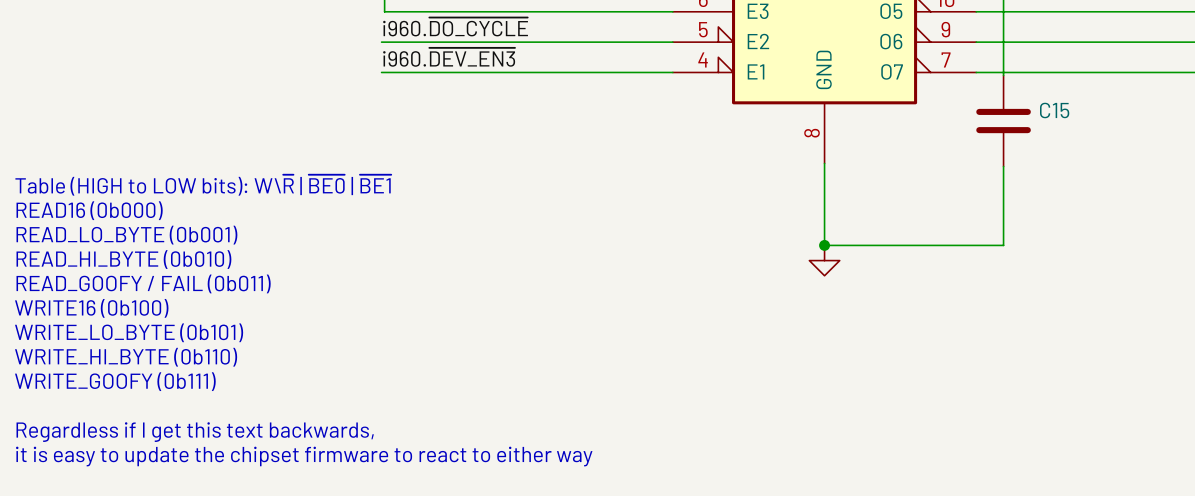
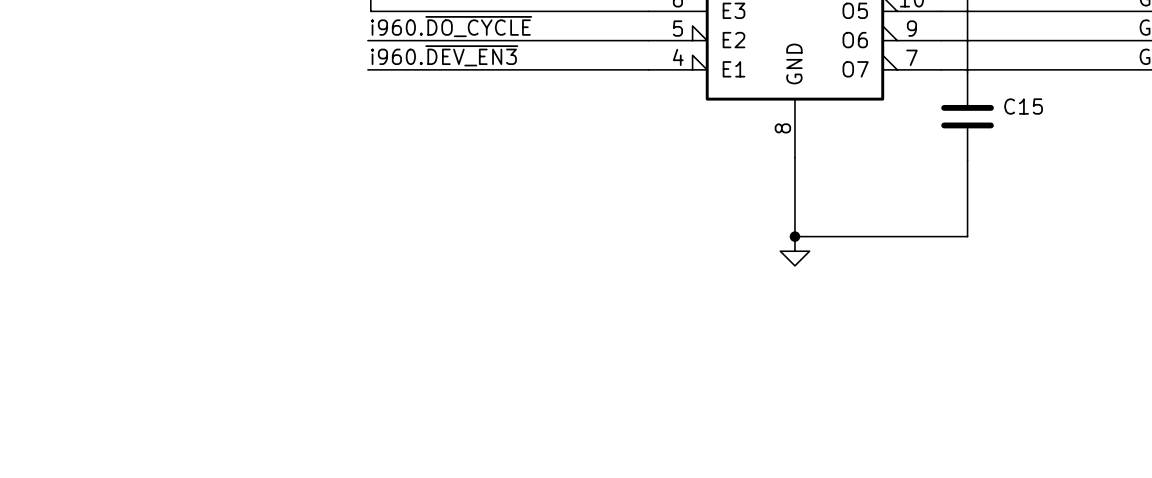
text: Table (HIGH to LOW bits): W\~{R} | ~{BE0} | ~{BE1} (203, 185) -> none
text: READ16 (0b000) (89, 210) -> none
text: READ_LO_BYTE (0b001) (126, 235) -> none
text: READ_HI_BYTE (0b010) (123, 259) -> none
text: READ_GOOFY / FAIL (0b011) (143, 283) -> none
text: WRITE16 (0b100) (91, 308) -> none
text: WRITE_LO_BYTE (0b101) (129, 332) -> none
text: WRITE_HI_BYTE (0b110) (126, 357) -> none
text: WRITE_GOOFY (0b111) (115, 381) -> none
text: Regardless if I get this text backwards, (195, 432) -> none
text: it is easy to update the chipset firmware to react to either way (304, 456) -> none

